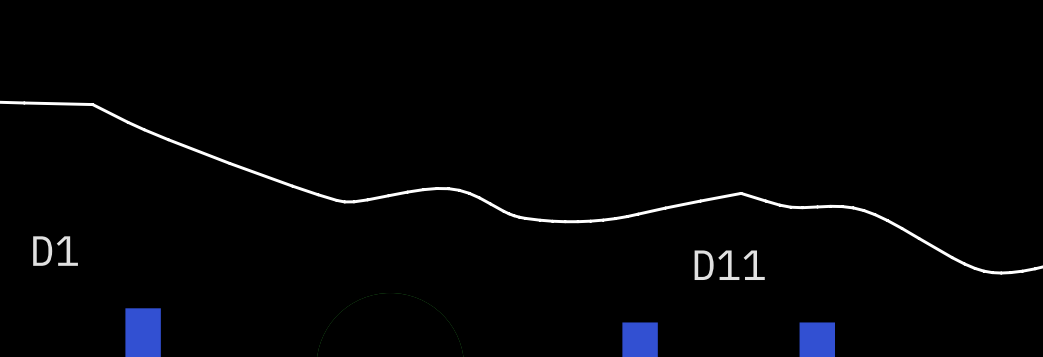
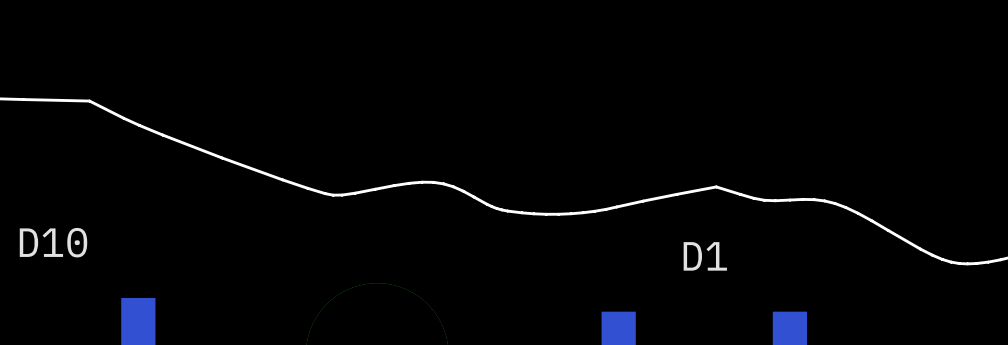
D1 name: D1 (55, 251) -> D10 (53, 242)
D11 name: D11 (729, 265) -> D1 (705, 256)

